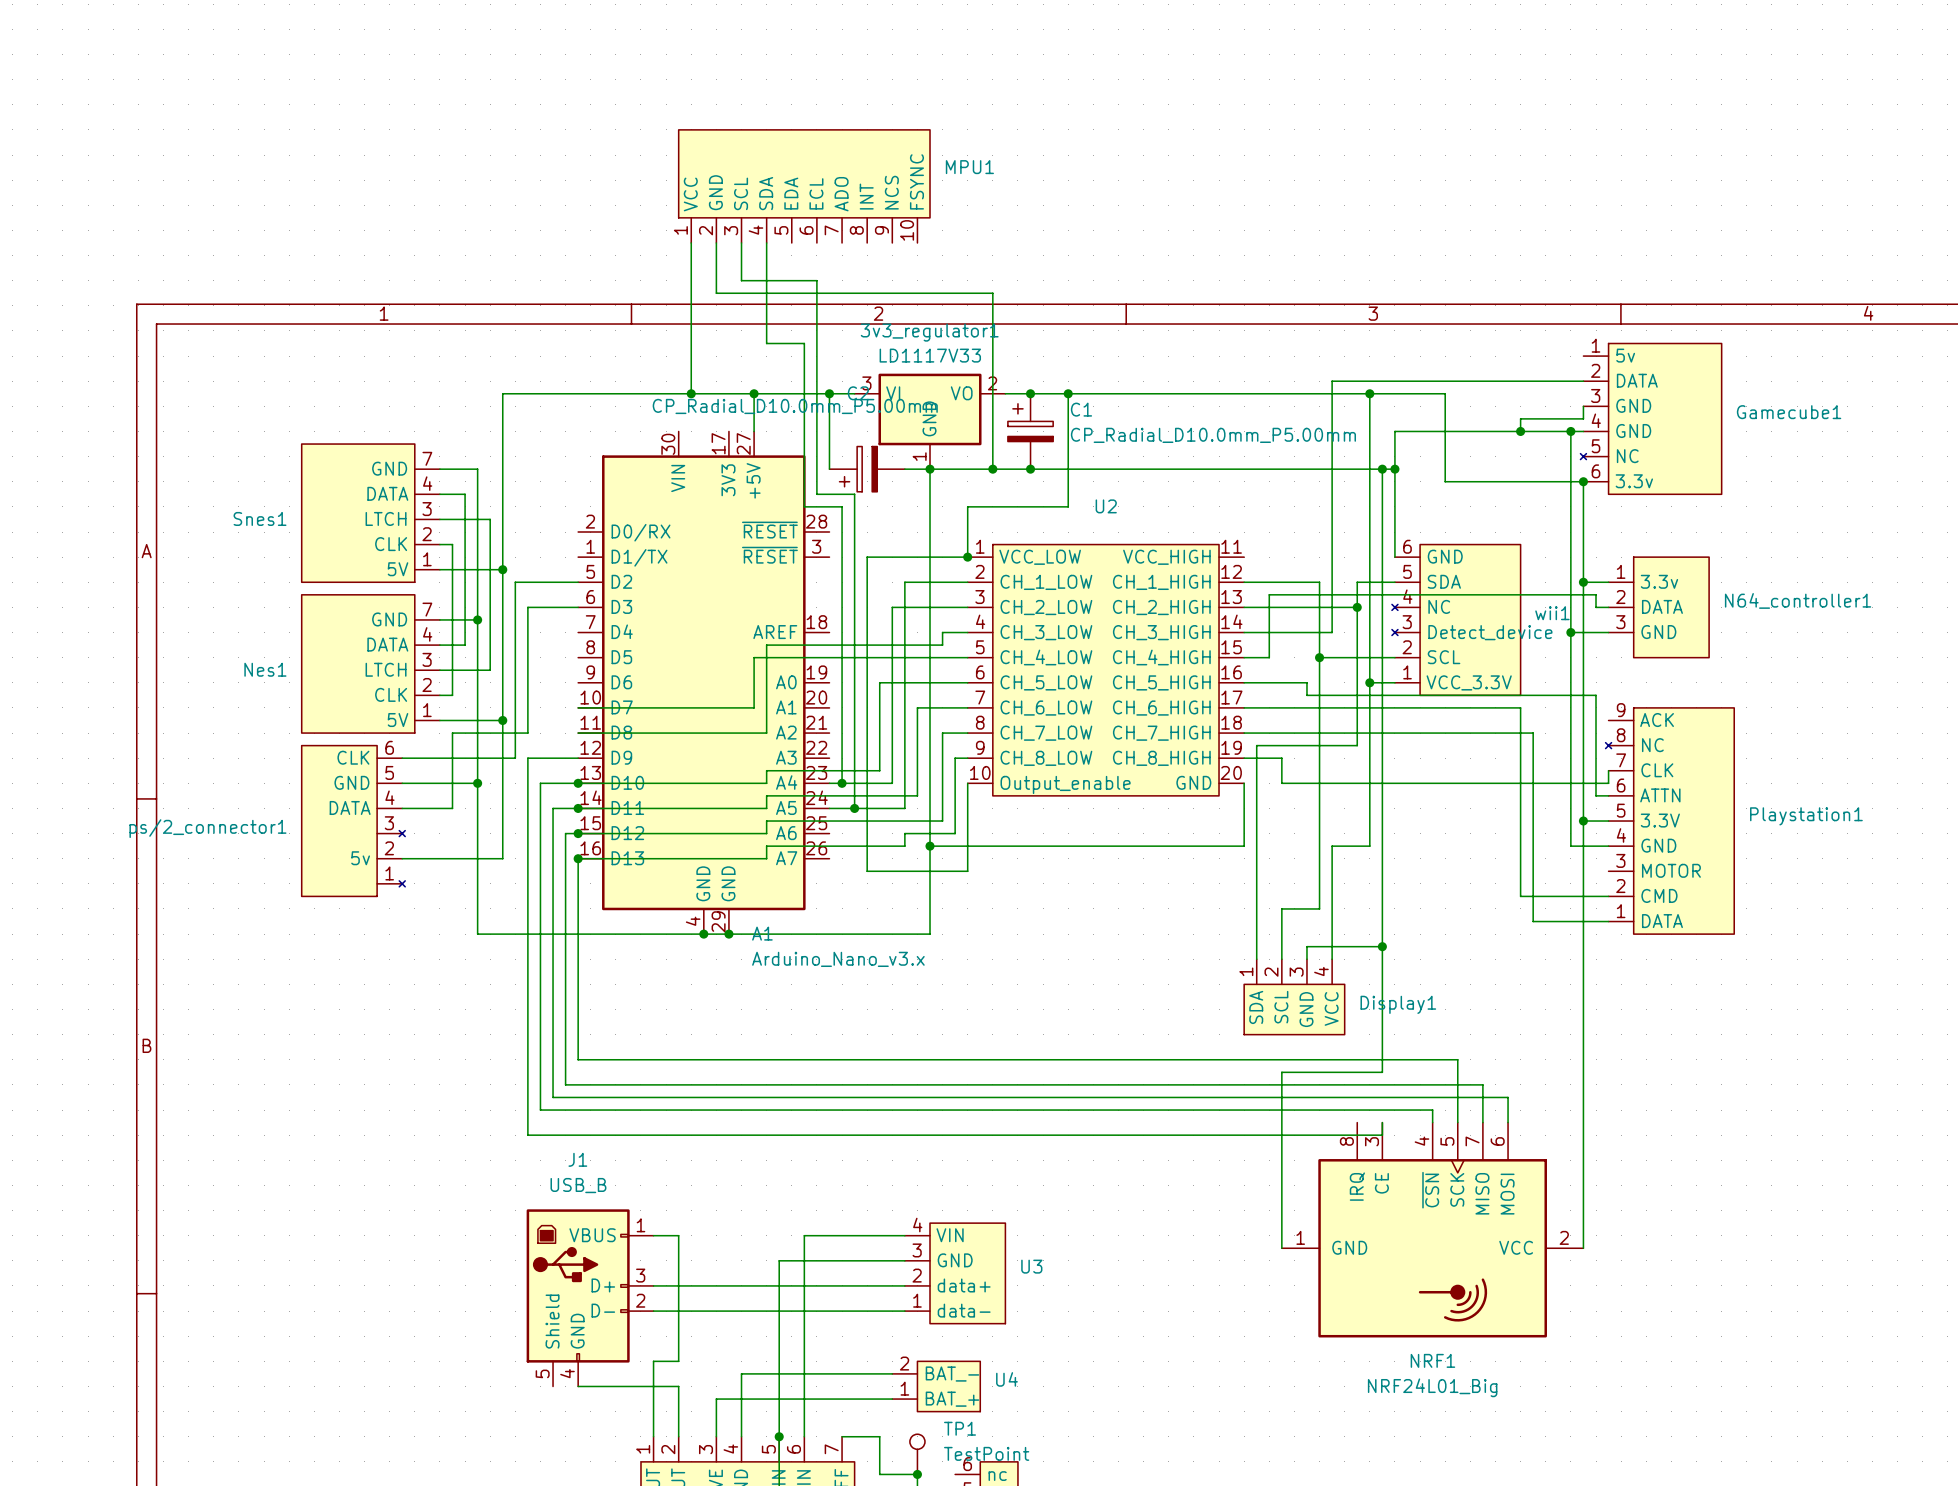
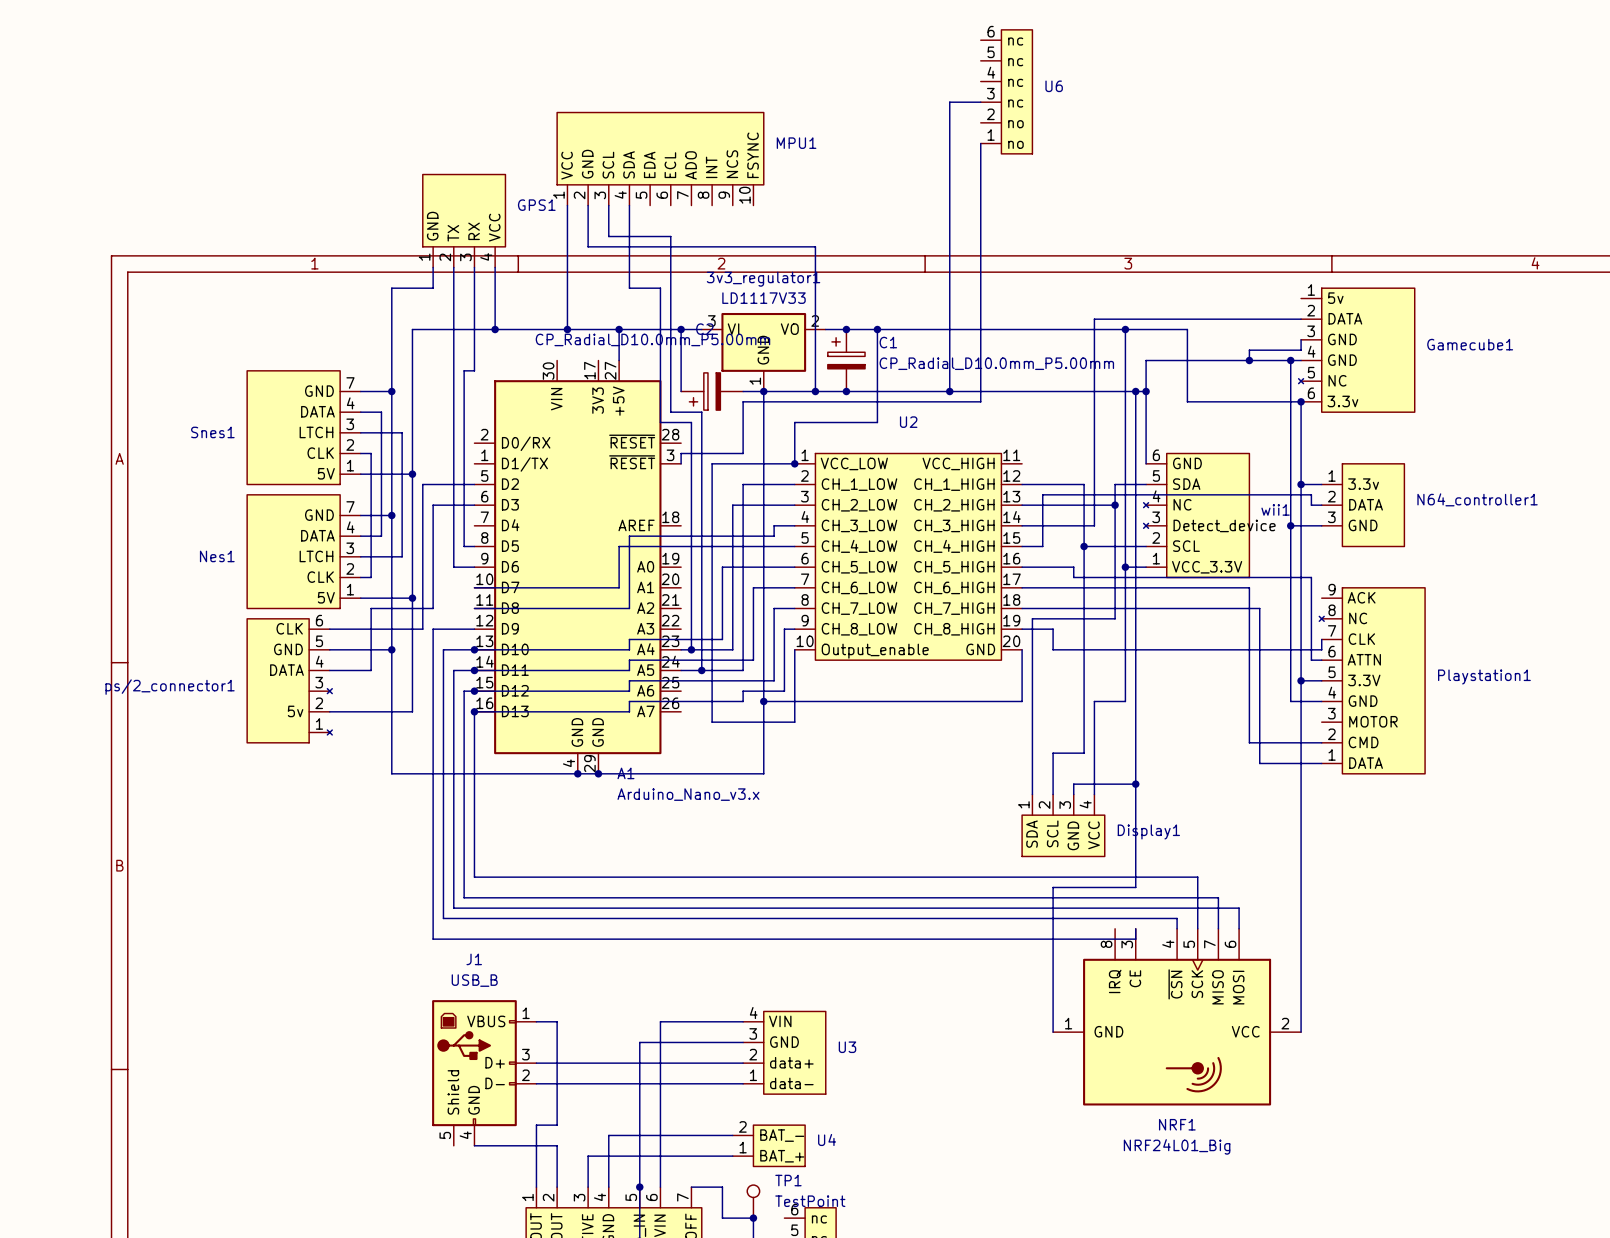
U6: none -> (1006, 91)
wire: none -> (980, 102) (949, 102) (949, 391)
wire: none -> (980, 143) (980, 401) (743, 401) (743, 453) (681, 453) (681, 463)
GPS1: none -> (464, 221)
wire: none -> (433, 267) (433, 288) (391, 288) (391, 391)
wire: none -> (453, 267) (453, 567) (474, 567)
wire: none -> (474, 267) (474, 370) (464, 370) (464, 546) (474, 546)
wire: none -> (495, 267) (495, 329)
junction: none -> (495, 329)
junction: none -> (391, 391)
junction: none -> (949, 391)

